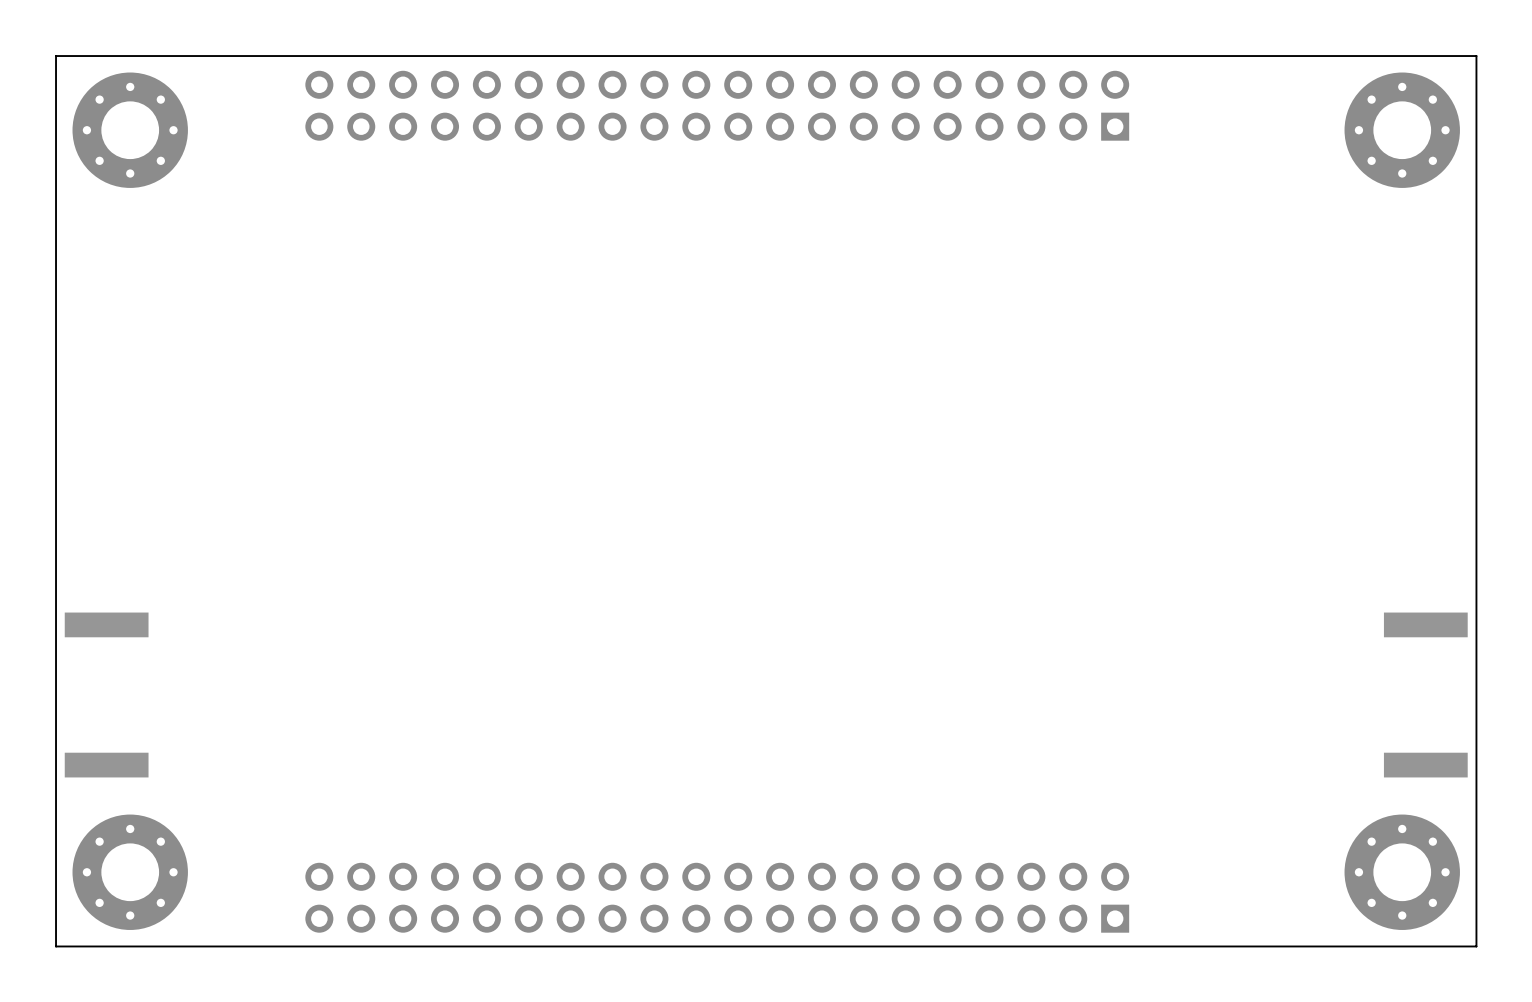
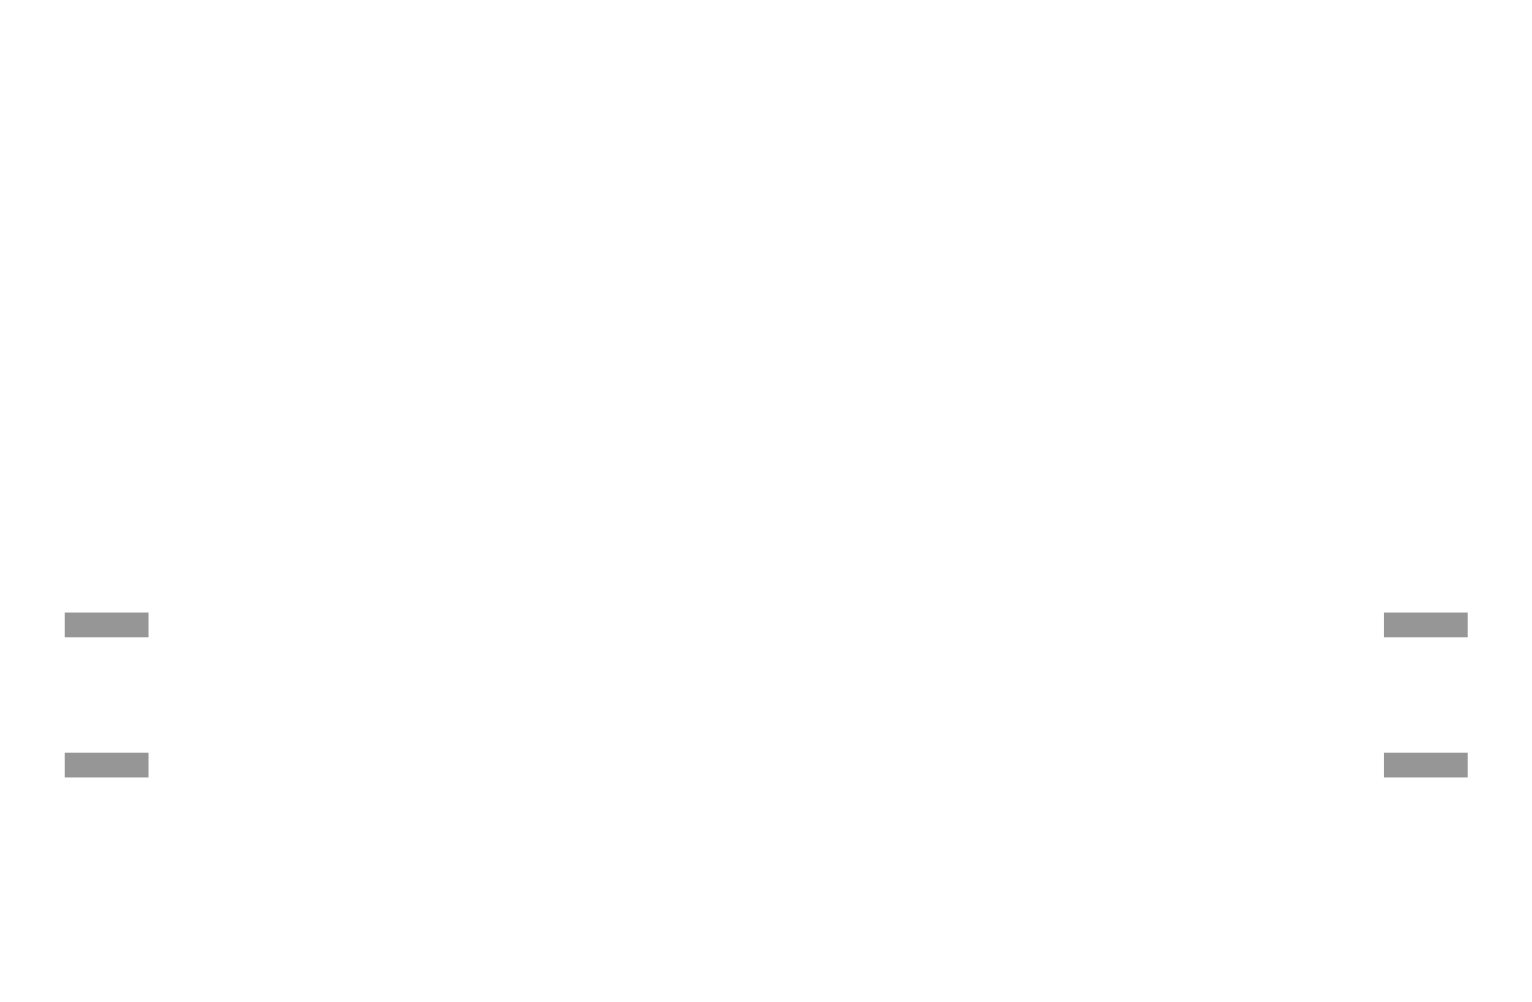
board edge: (1476, 56) (56, 56) (56, 946) (1476, 946) (1476, 56) -> none
part: (717, 105) -> none
part: (130, 130) -> none
part: (1402, 130) -> none
part: (130, 872) -> none
part: (1402, 872) -> none
part: (717, 897) -> none

